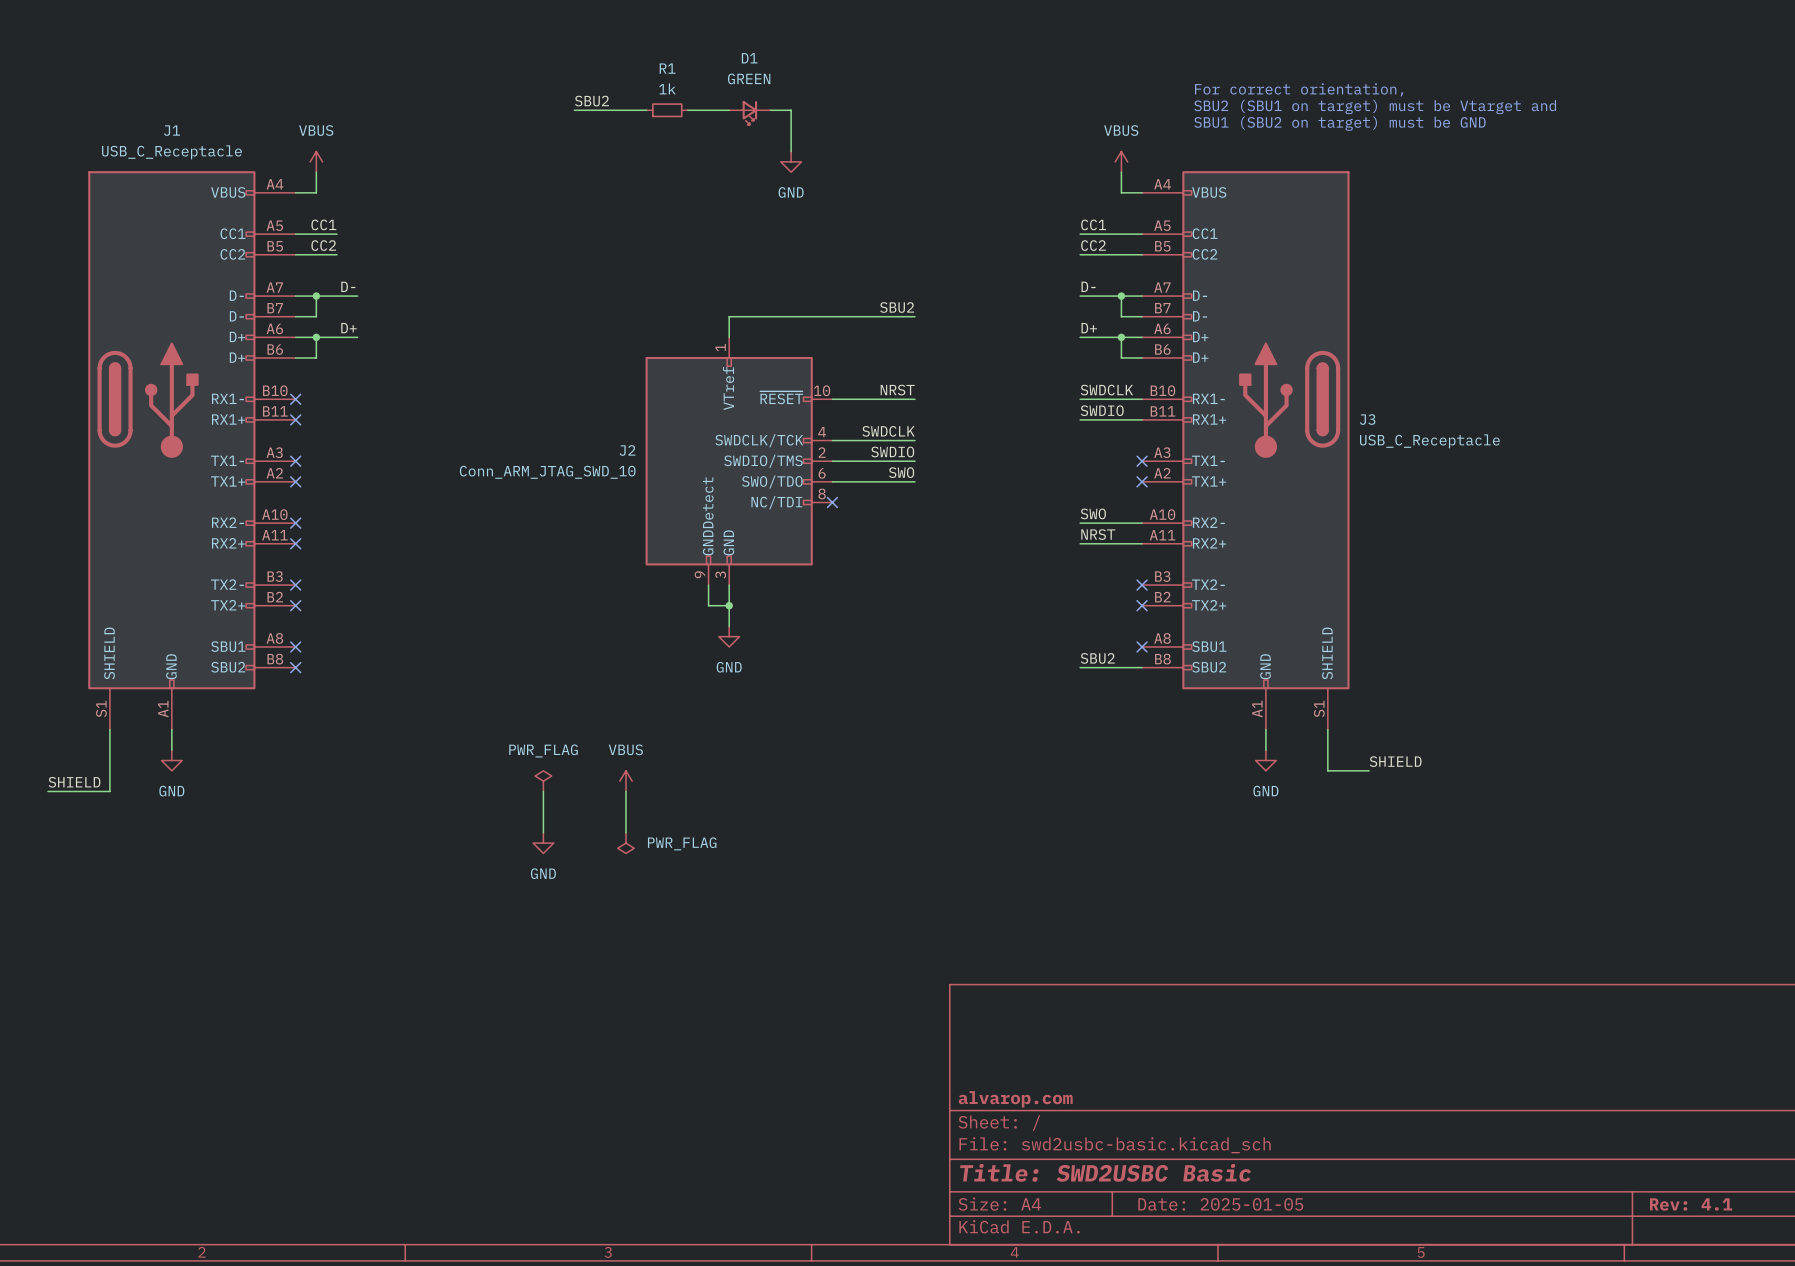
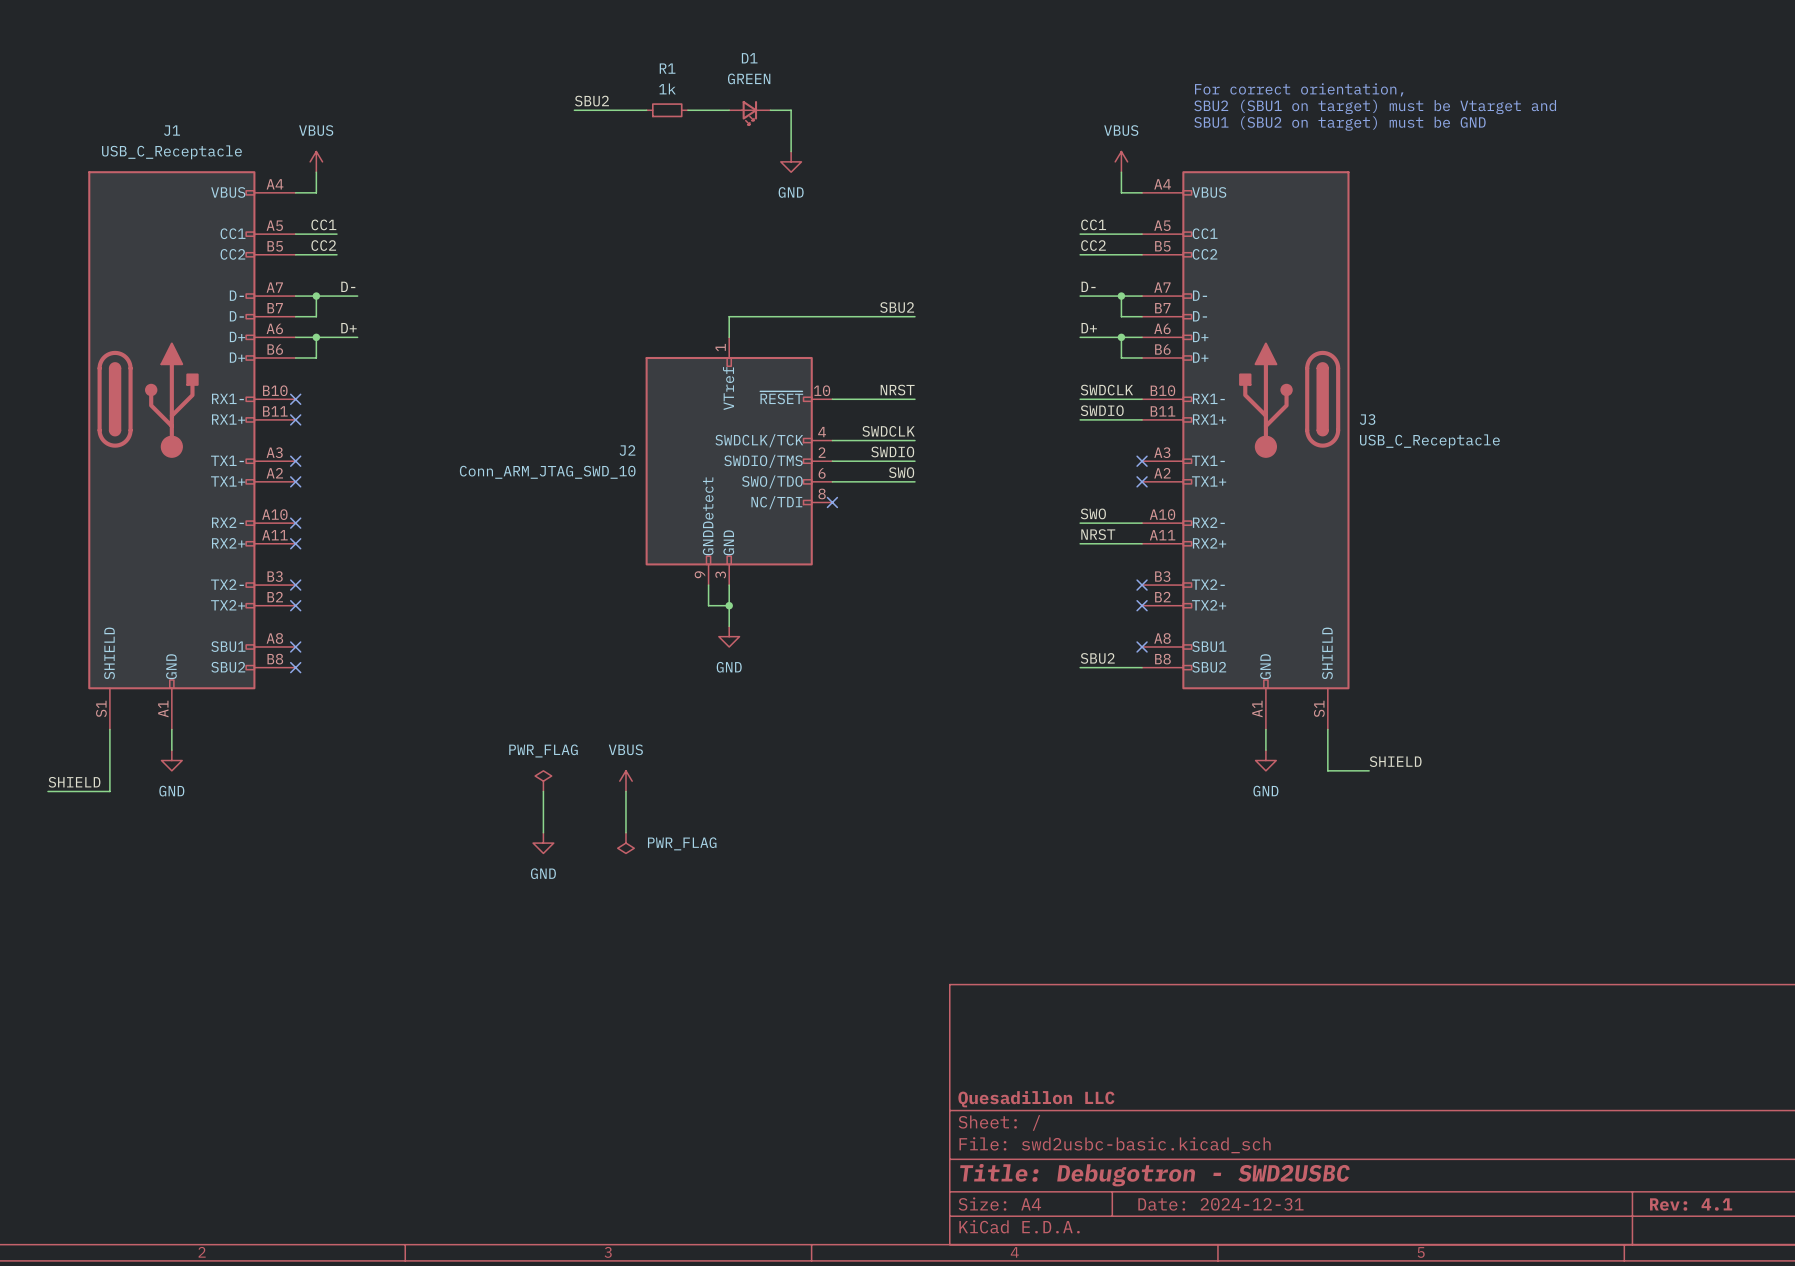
title block: alvarop.com (1015, 1099) -> Quesadillon LLC (1036, 1099)
title block: Title: SWD2USBC Basic (1105, 1172) -> Title: Debugotron - SWD2USBC (1154, 1175)
title block: Date: 2025-01-05 (1220, 1204) -> Date: 2024-12-31 (1220, 1204)

